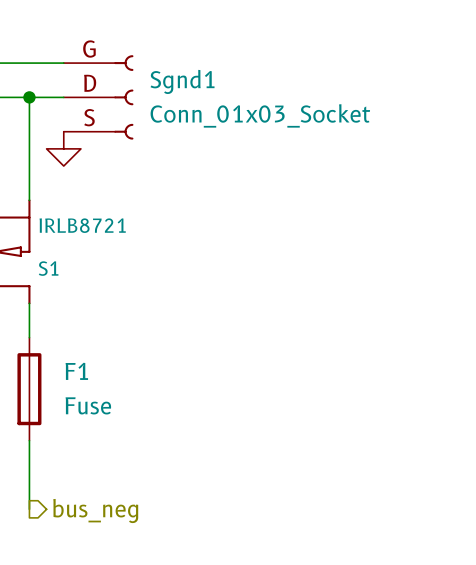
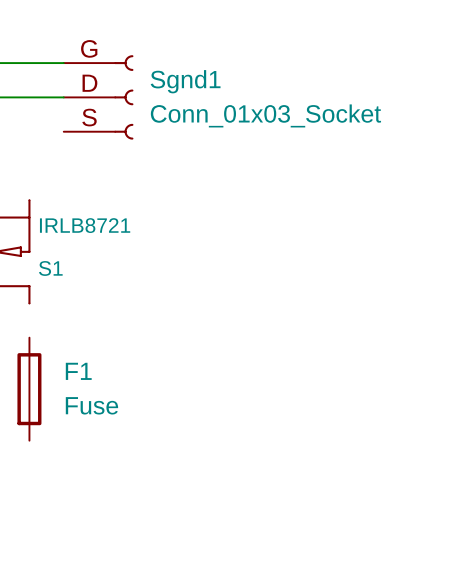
wire: (29, 97) (29, 200) -> none
junction: (29, 97) -> none
power symbol: (63, 148) -> none
wire: (29, 303) (29, 337) -> none
wire: (29, 440) (29, 509) -> none
hierarchical label: bus_neg (95, 511) -> none

